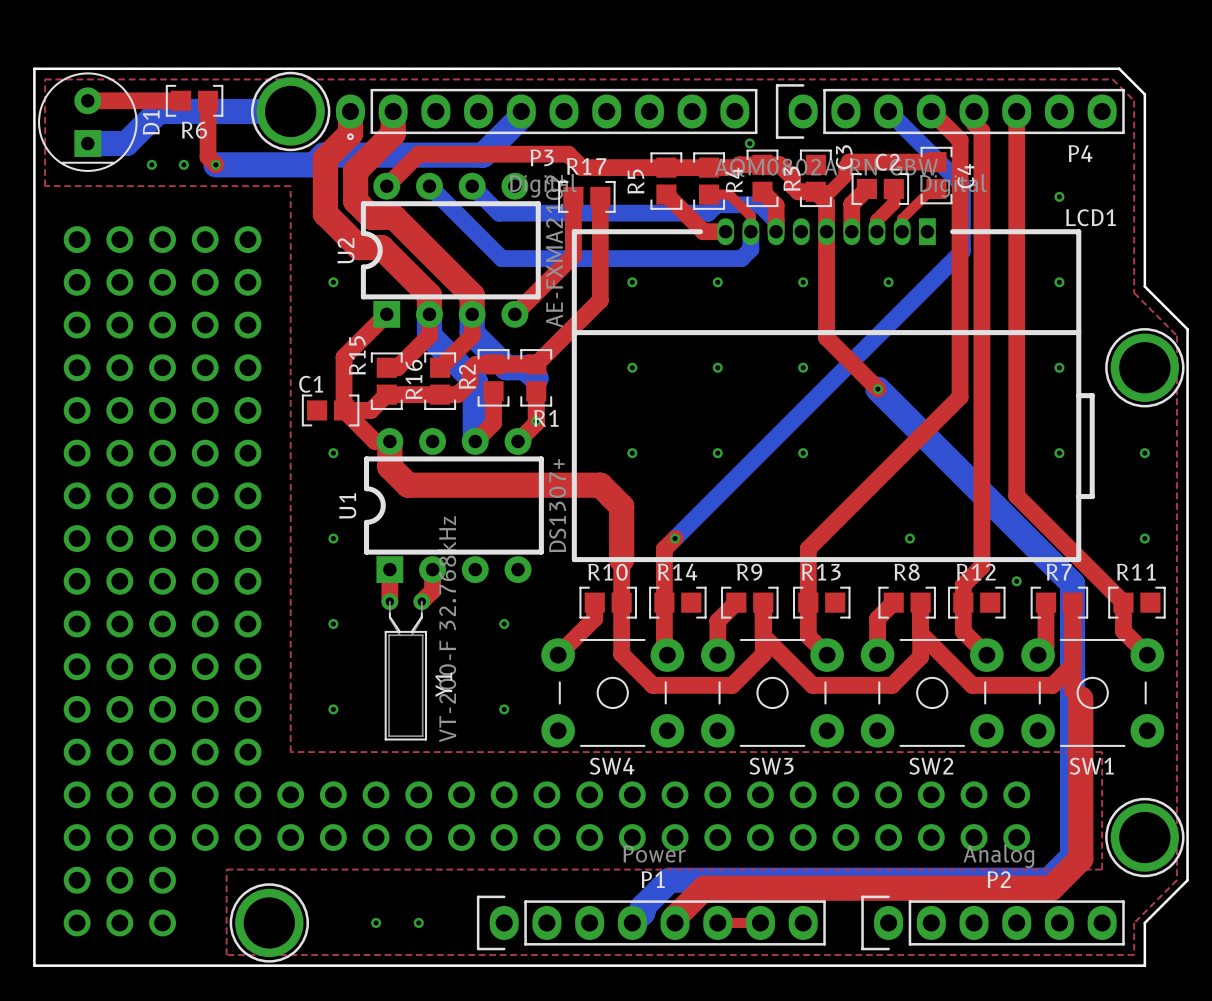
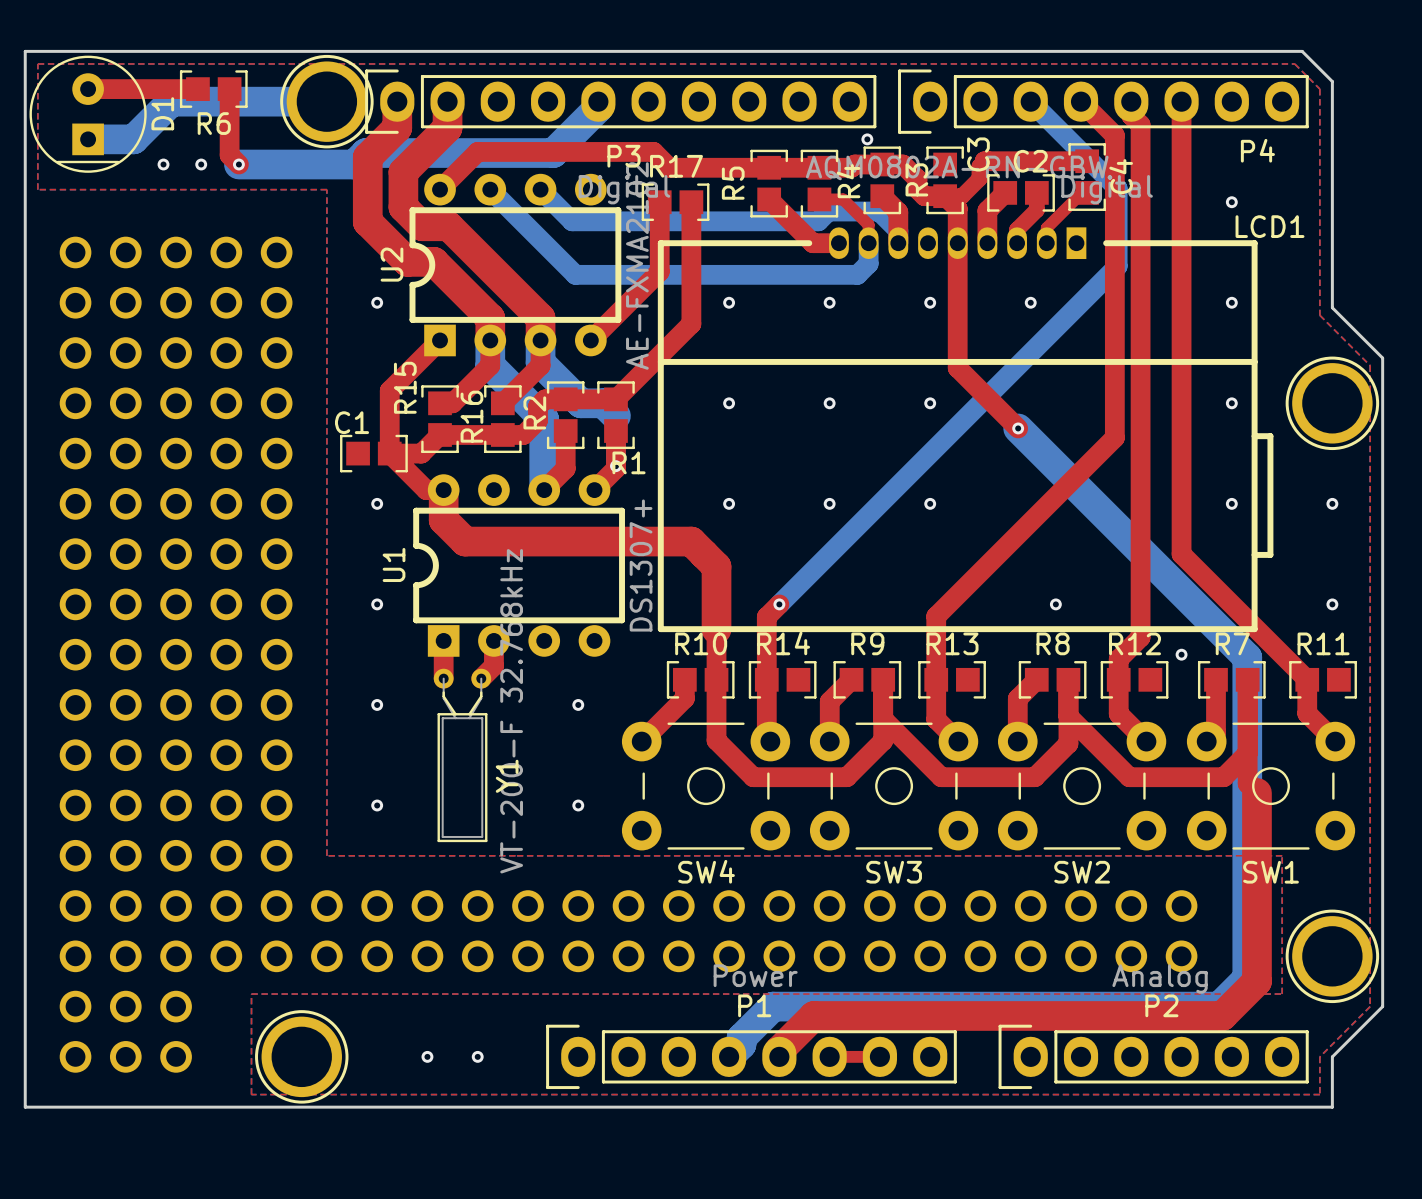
P3 footprint: [335, 88, 758, 141] -> [365, 69, 877, 134]

